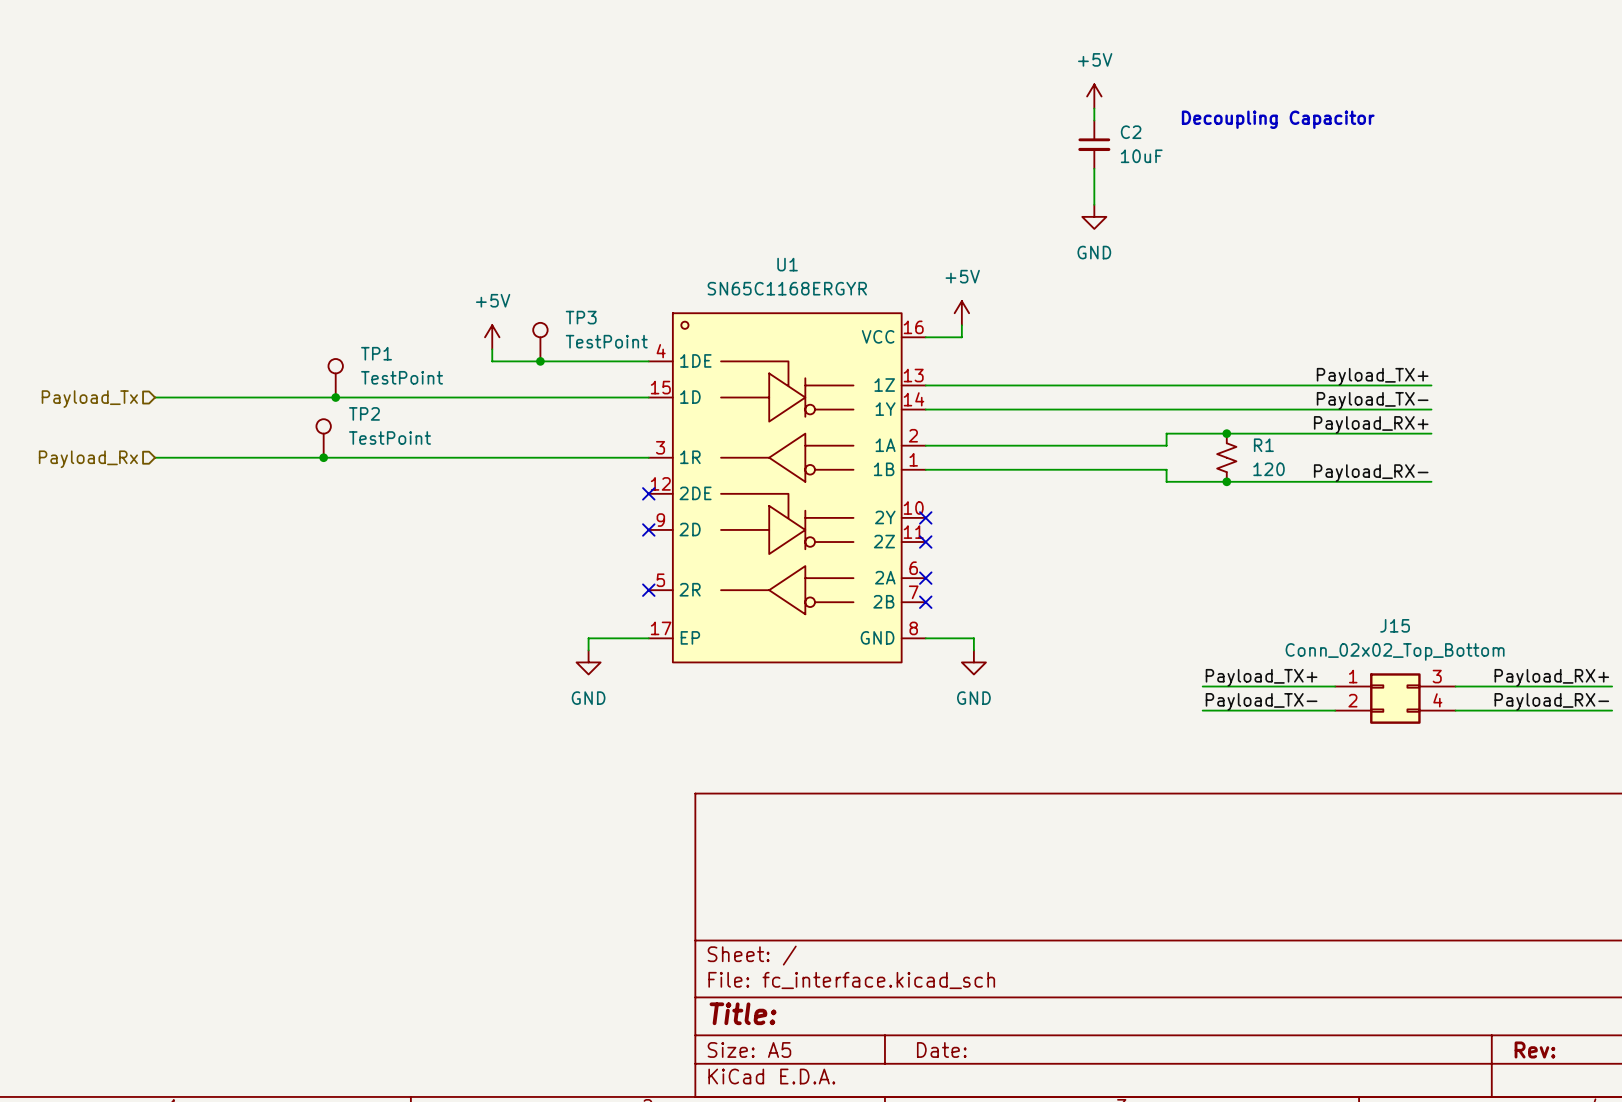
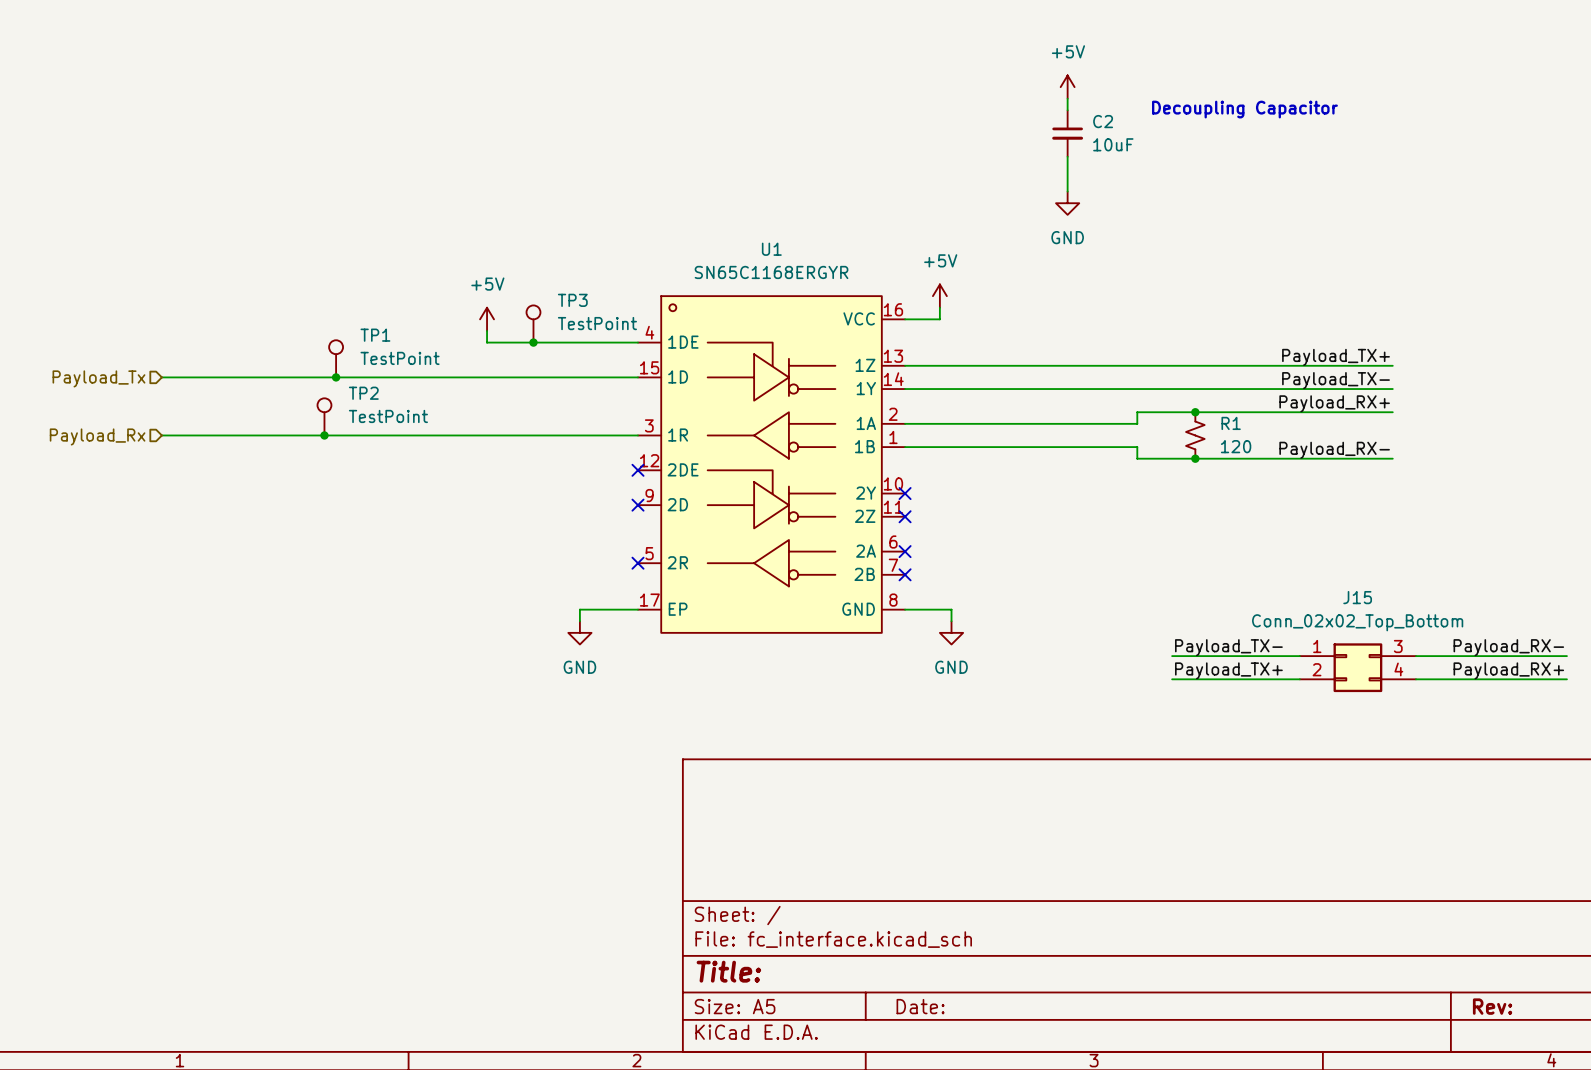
label: Payload_TX+ (1261, 677) -> Payload_TX- (1228, 647)
label: Payload_RX+ (1551, 677) -> Payload_RX- (1508, 647)
label: Payload_TX- (1261, 701) -> Payload_TX+ (1228, 670)
label: Payload_RX- (1551, 701) -> Payload_RX+ (1508, 670)

